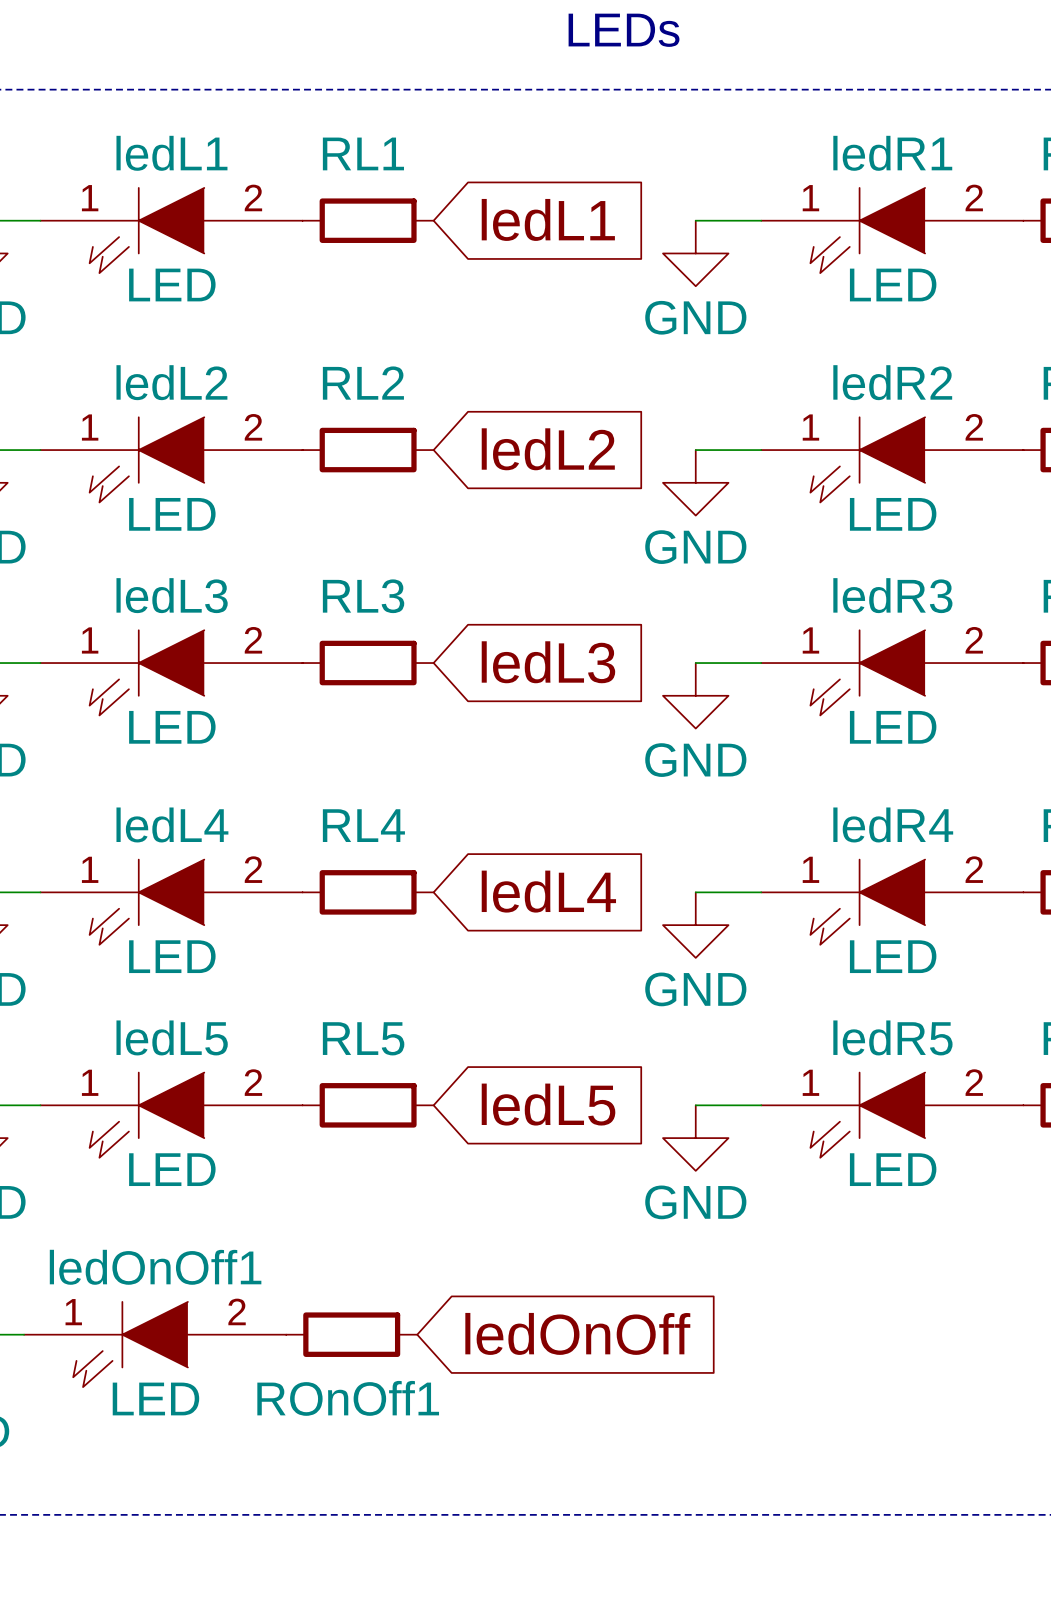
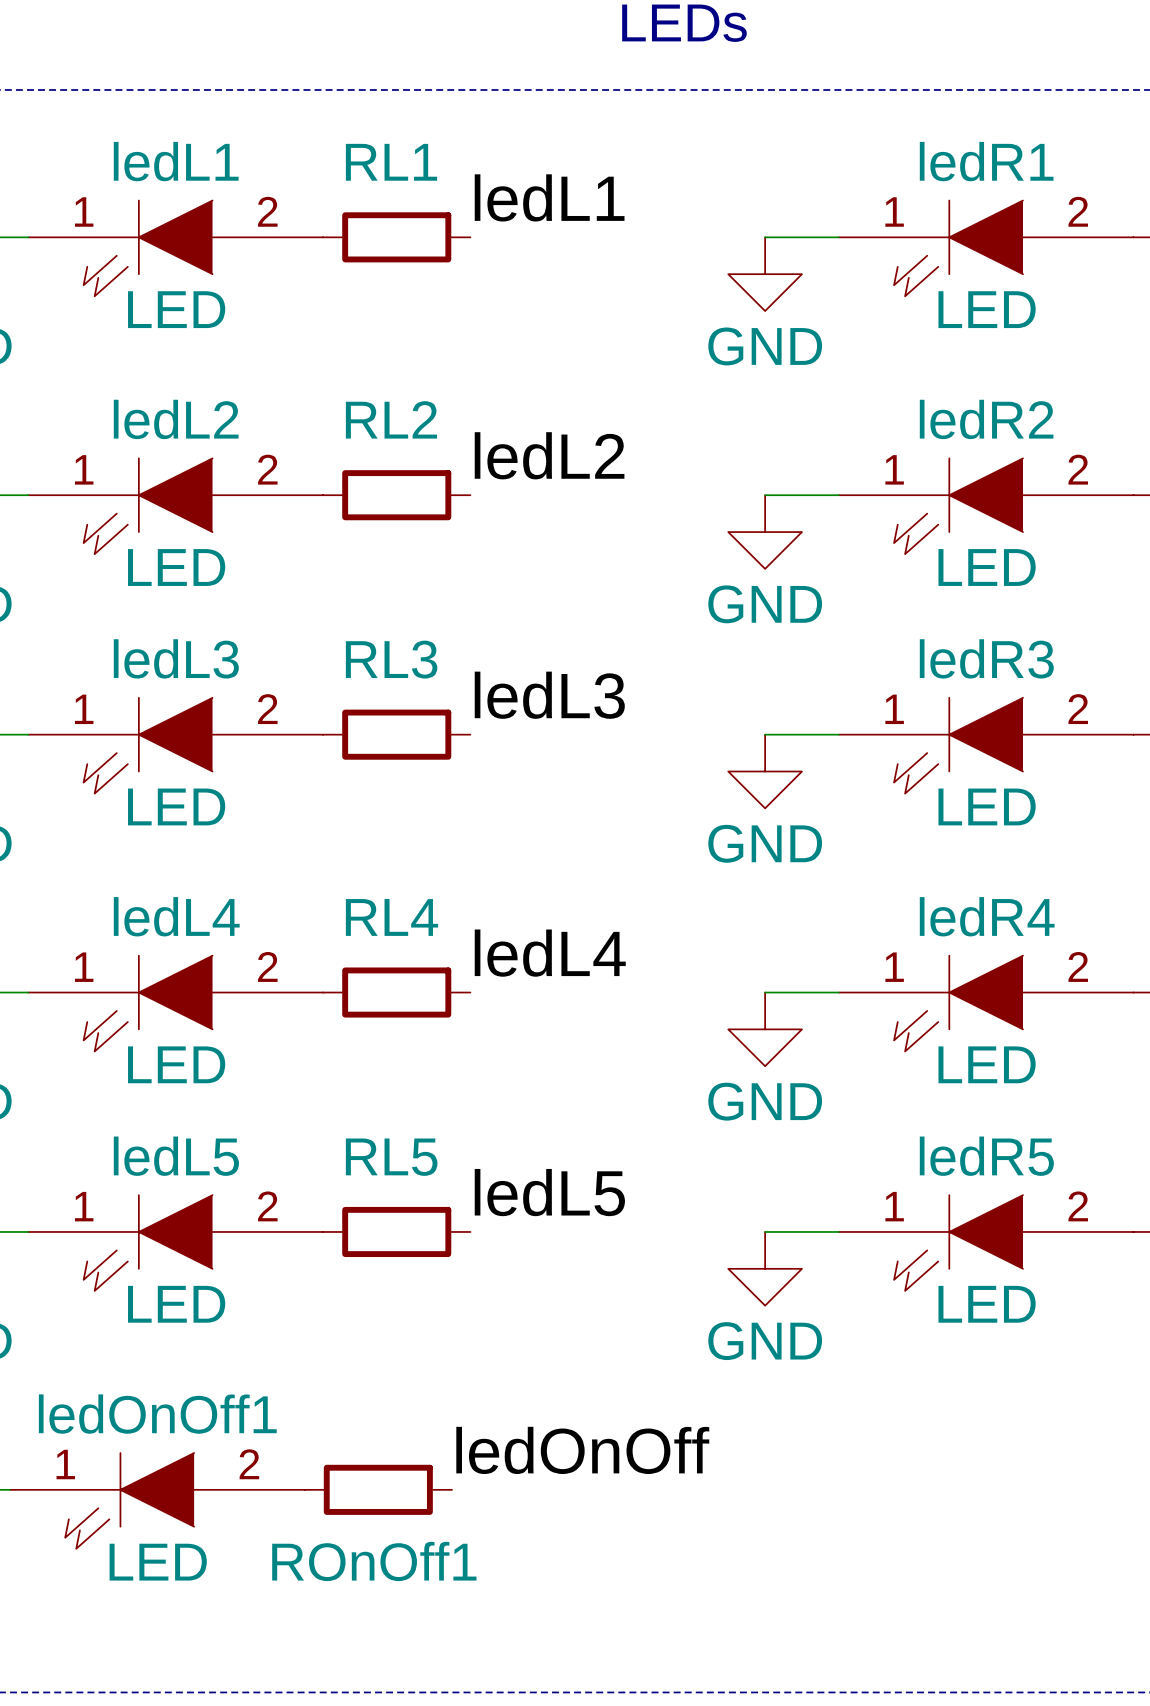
label: none -> ledL1 (549, 197)
global label: ledL1 (548, 219) -> none
label: none -> ledL2 (549, 455)
global label: ledL2 (548, 449) -> none
label: none -> ledL3 (549, 695)
global label: ledL3 (548, 662) -> none
label: none -> ledL4 (550, 953)
global label: ledL4 (548, 891) -> none
label: none -> ledL5 (549, 1192)
global label: ledL5 (548, 1104) -> none
label: none -> ledOnOff (582, 1450)
global label: ledOnOff (577, 1333) -> none

